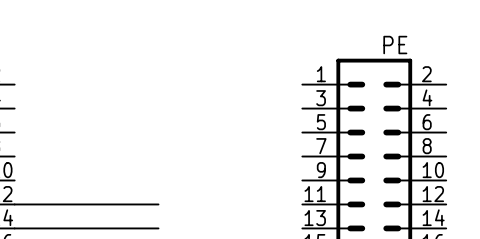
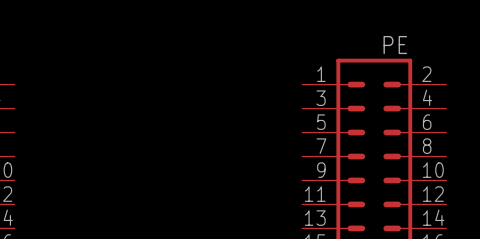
wire: (14, 204) (158, 204) -> none
wire: (14, 228) (158, 228) -> none

